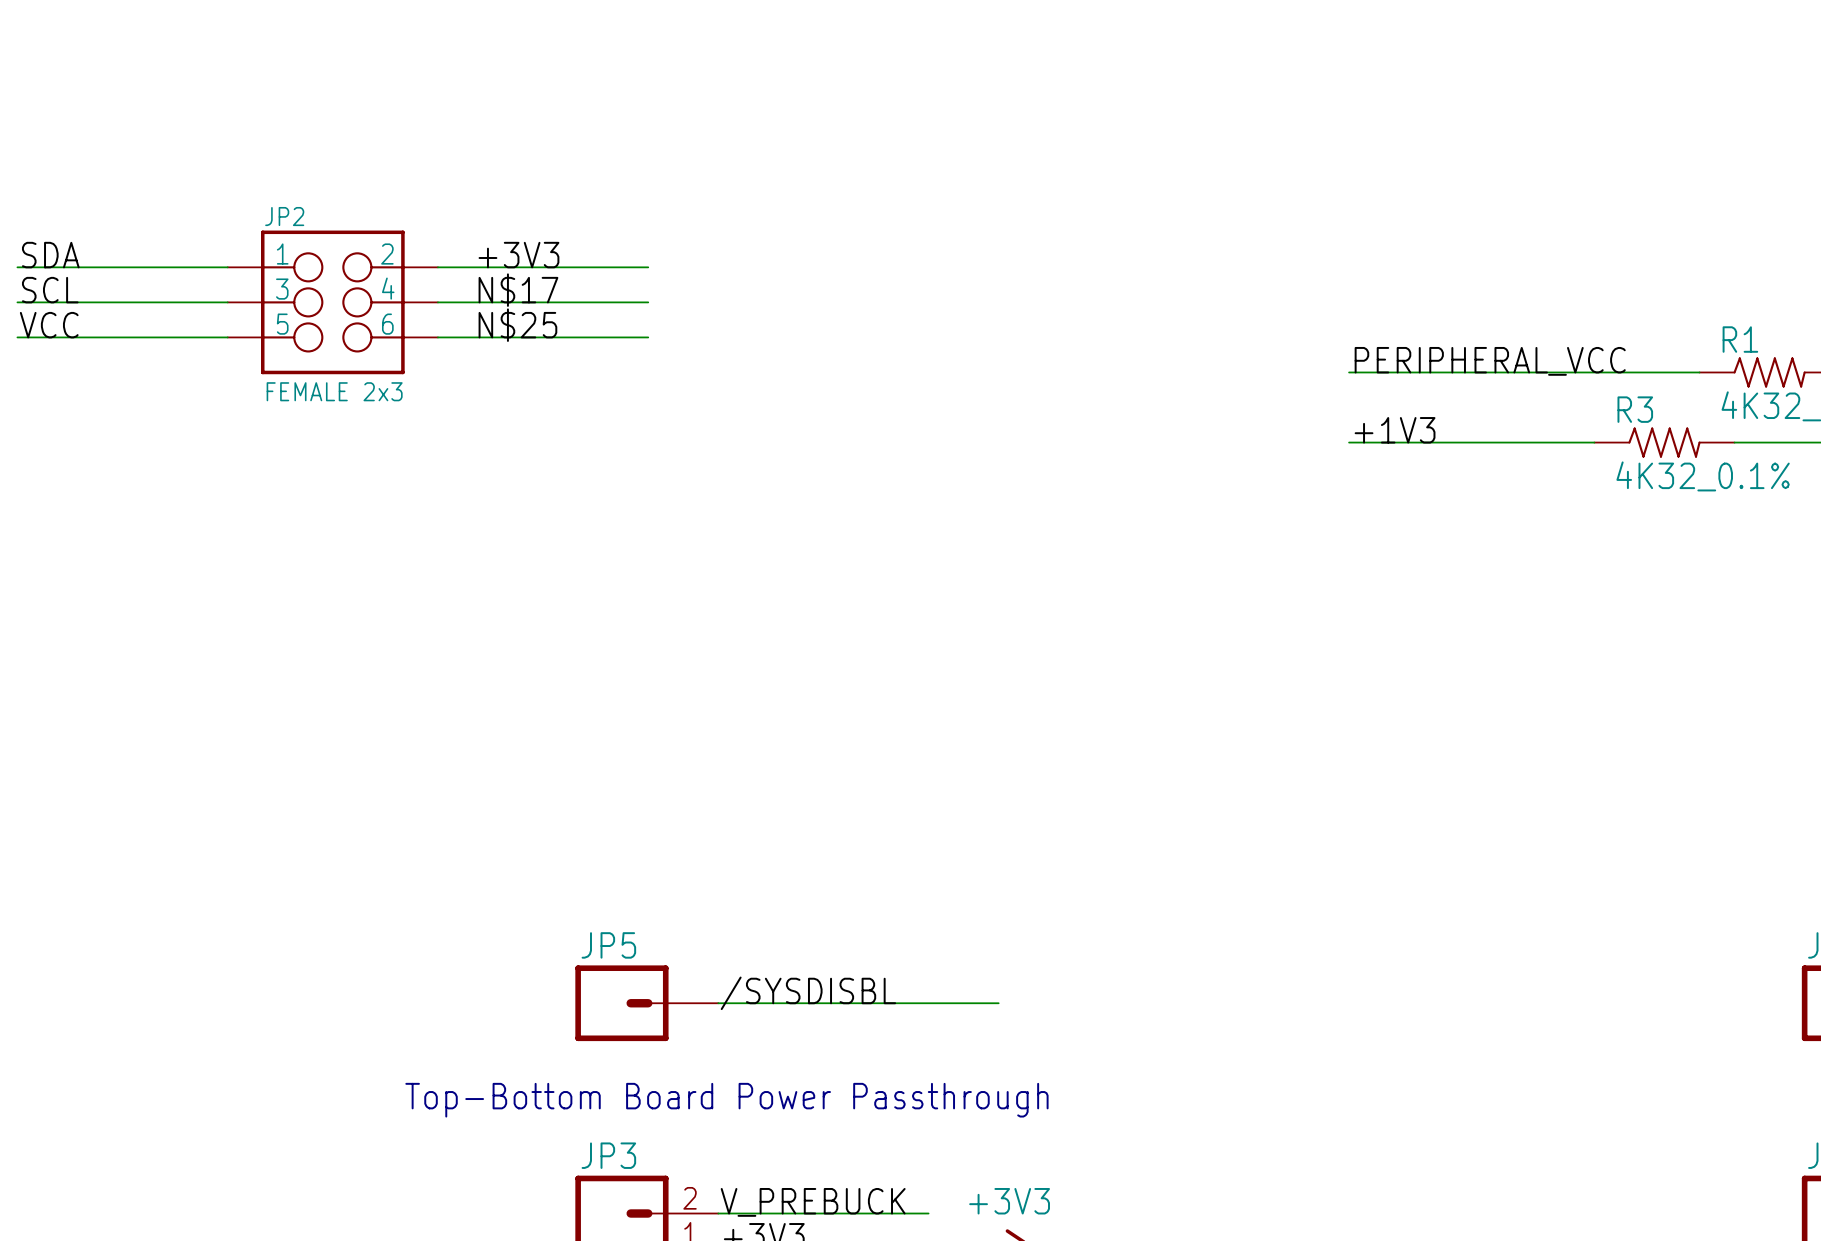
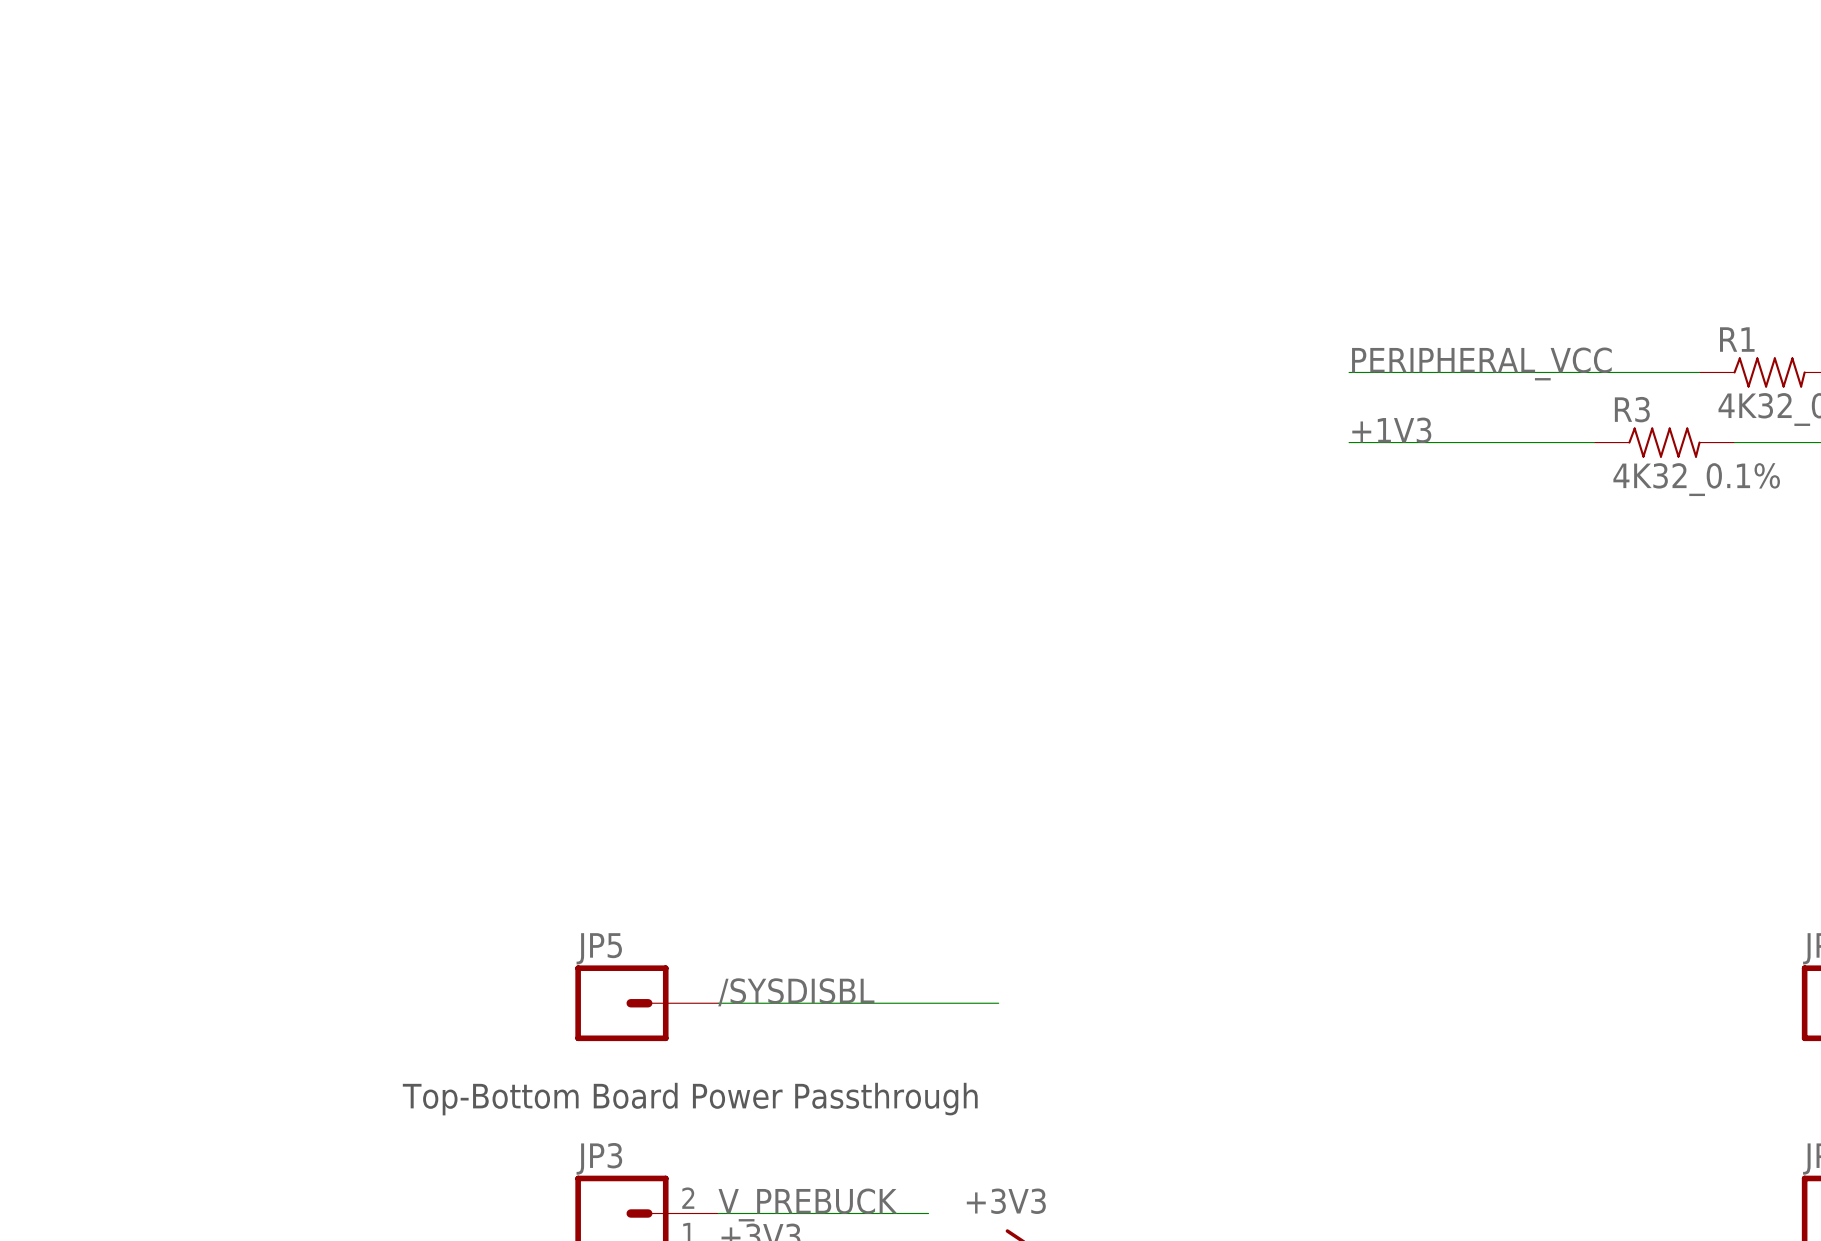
label: SDA (50, 255) -> none
label: +3V3 (518, 255) -> none
wire: (17, 267) (227, 267) -> none
wire: (437, 267) (648, 267) -> none
label: SCL (50, 290) -> none
label: N$17 (518, 290) -> none
wire: (17, 302) (227, 302) -> none
JP2: FEMALE 2x3 (332, 302) -> none
wire: (437, 302) (648, 302) -> none
label: VCC (49, 325) -> none
label: N$25 (517, 325) -> none
wire: (17, 337) (227, 337) -> none
wire: (437, 337) (648, 337) -> none

